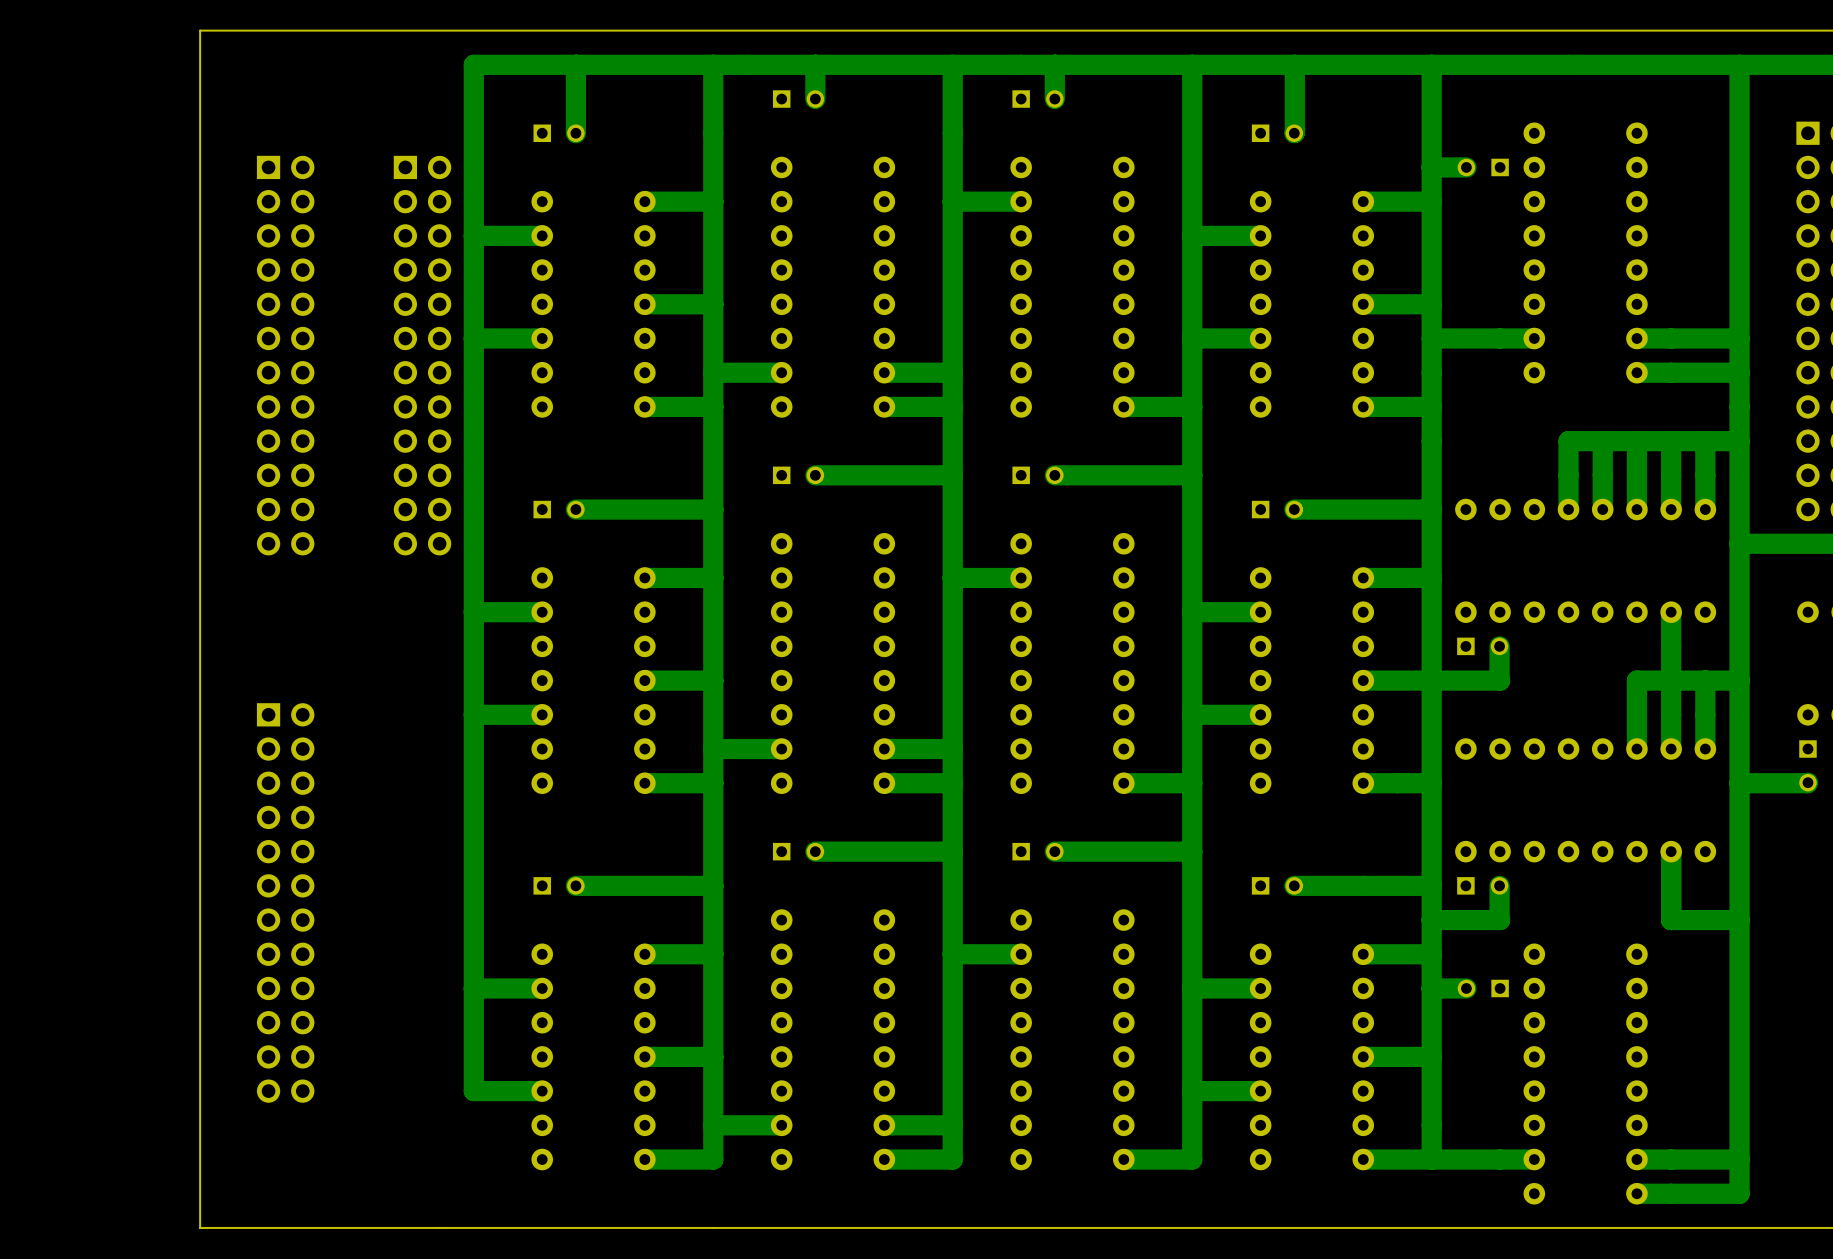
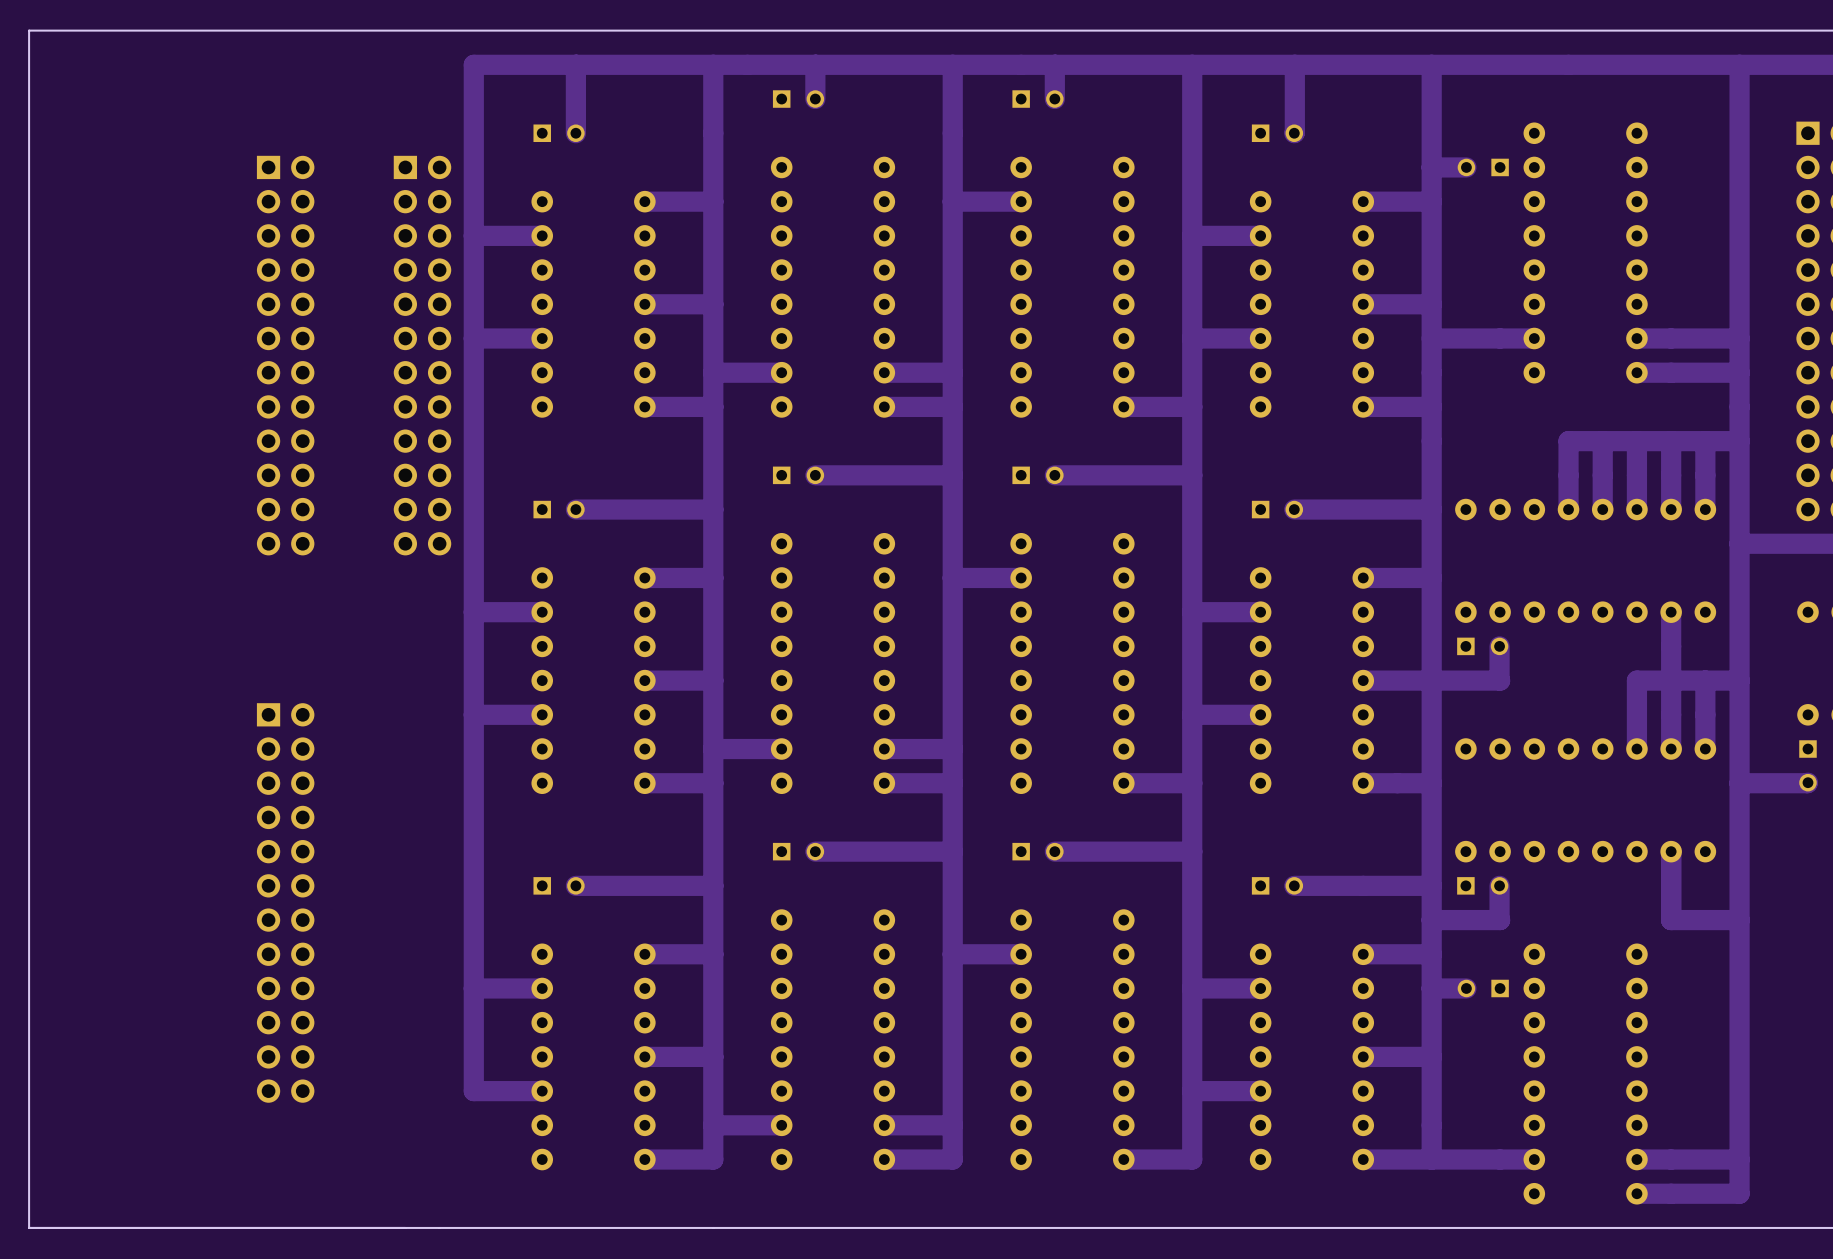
board edge: (200, 30) (200, 1227) -> (200, 30) (29, 30) (29, 1227) (200, 1227)

